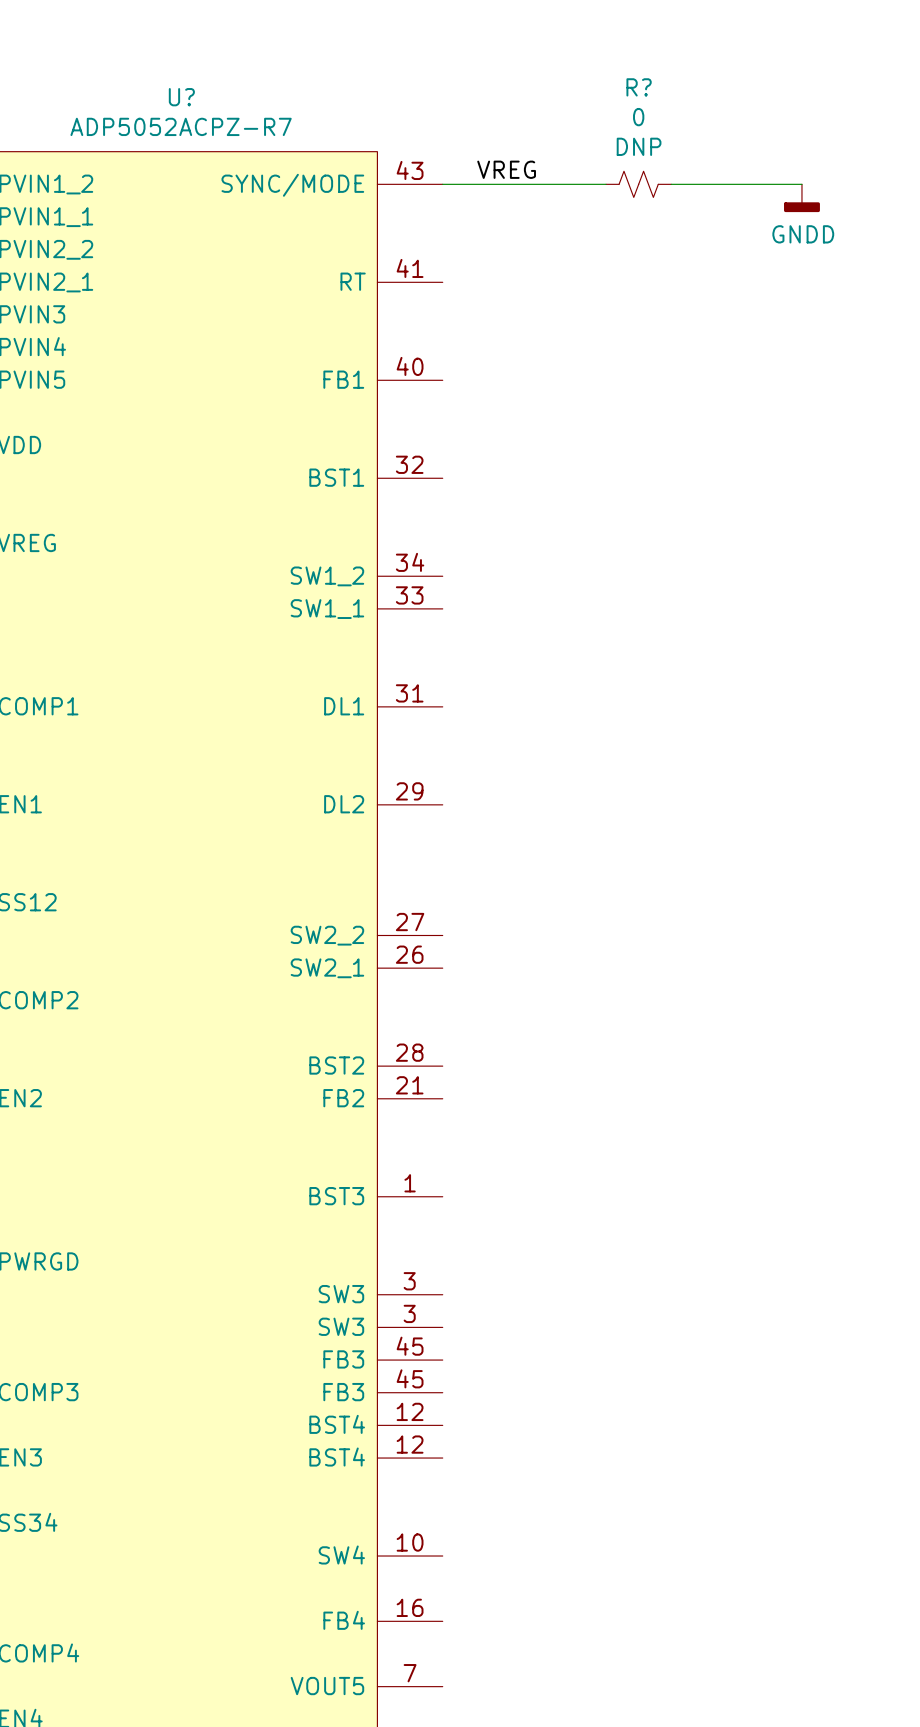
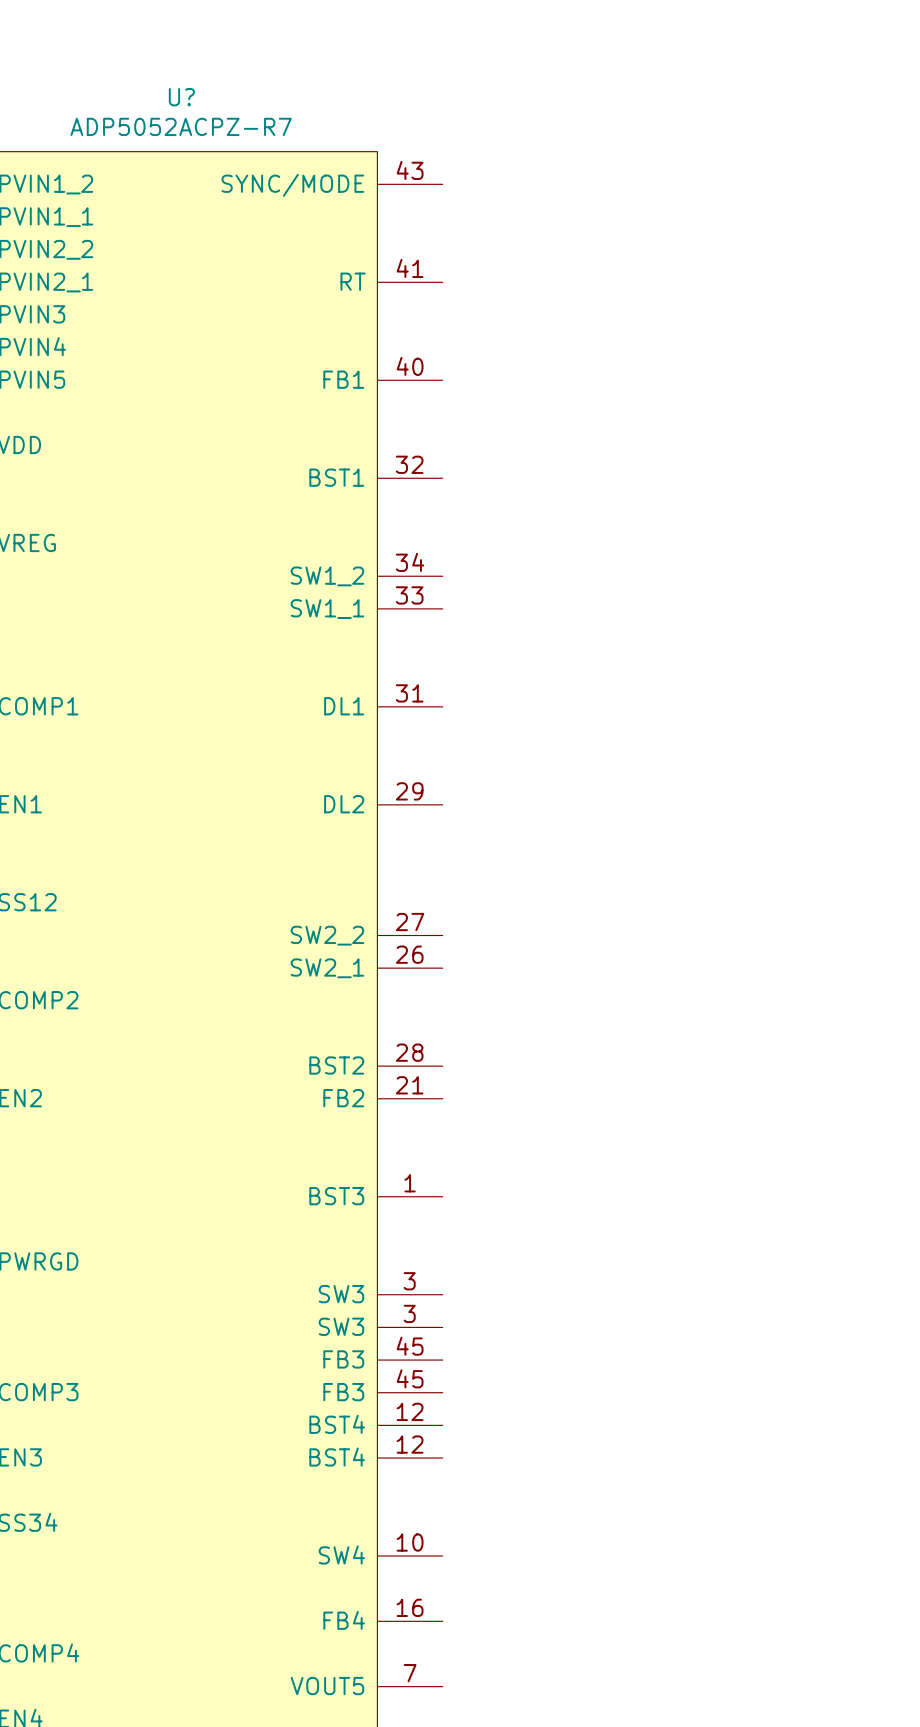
label: VREG (506, 169) -> none
wire: (442, 184) (606, 184) -> none
R?: 0 (638, 184) -> none
wire: (671, 184) (801, 184) -> none
power symbol: GNDD (801, 198) -> none

